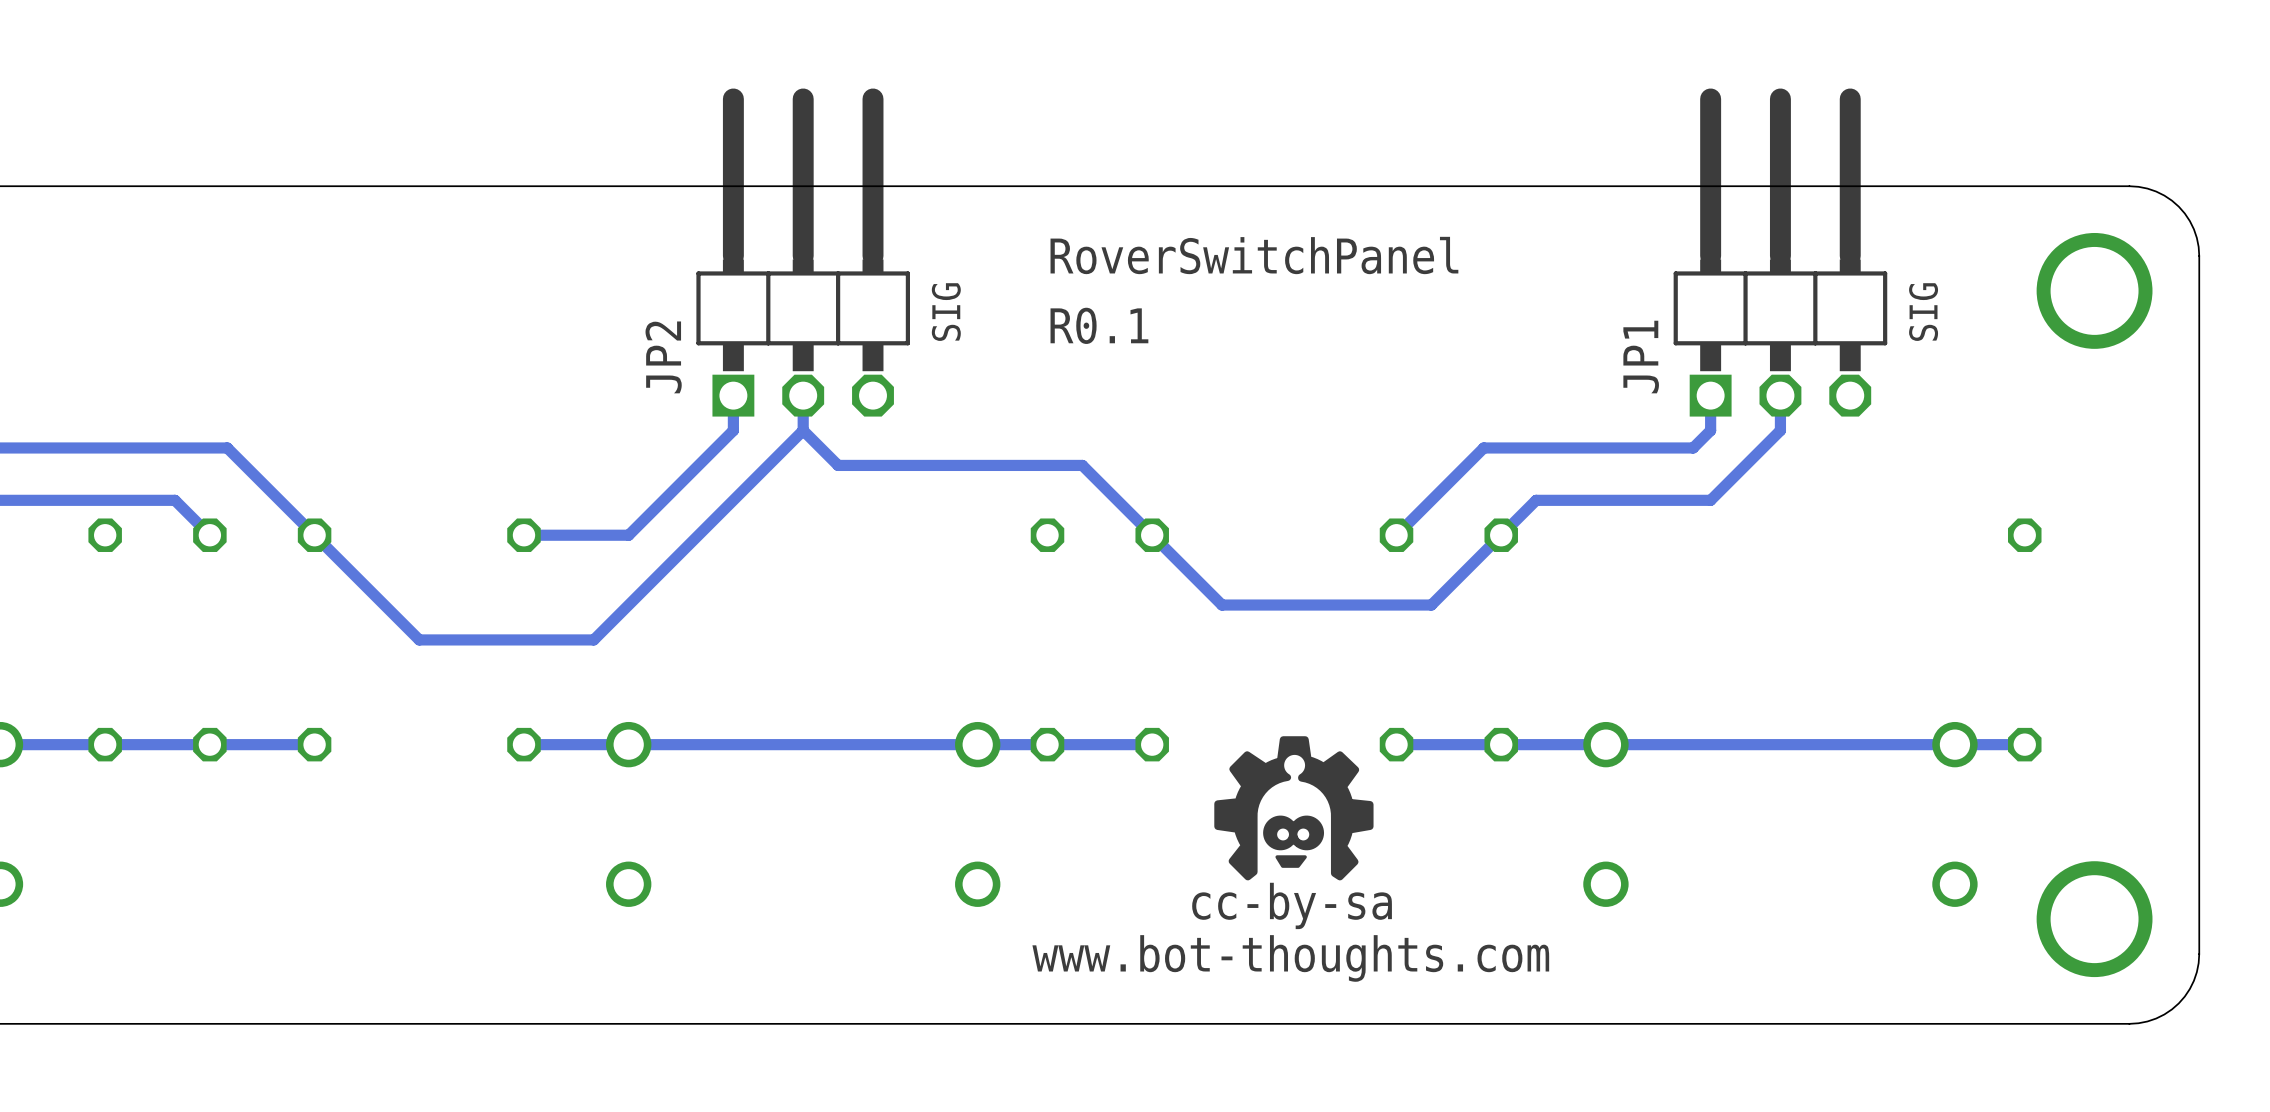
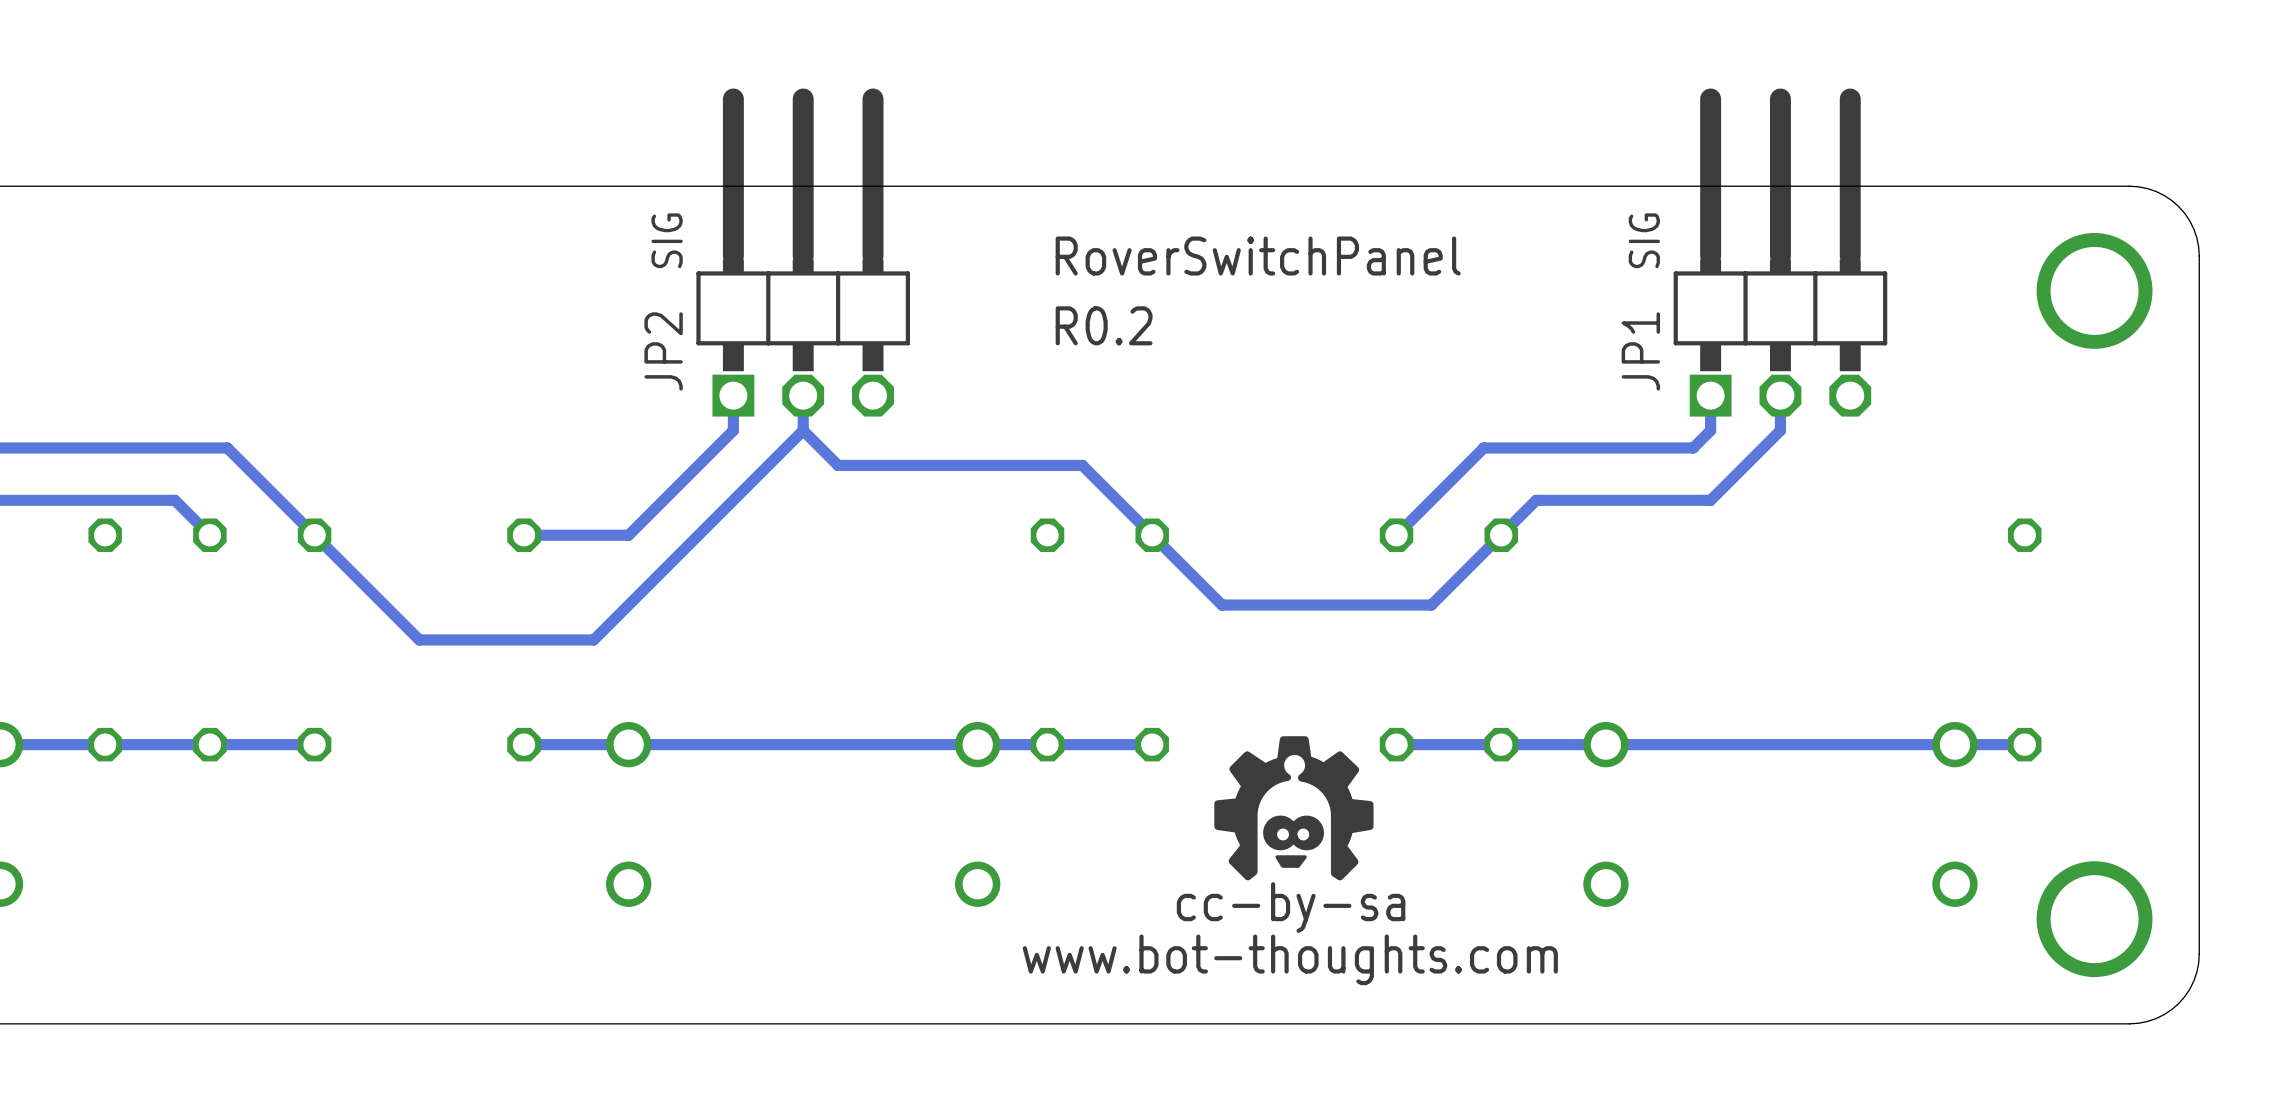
text position: SIG (946, 312) -> SIG (667, 240)
text position: SIG (1923, 312) -> SIG (1644, 240)
text: R0.1 (1099, 325) -> R0.2 (1104, 325)

